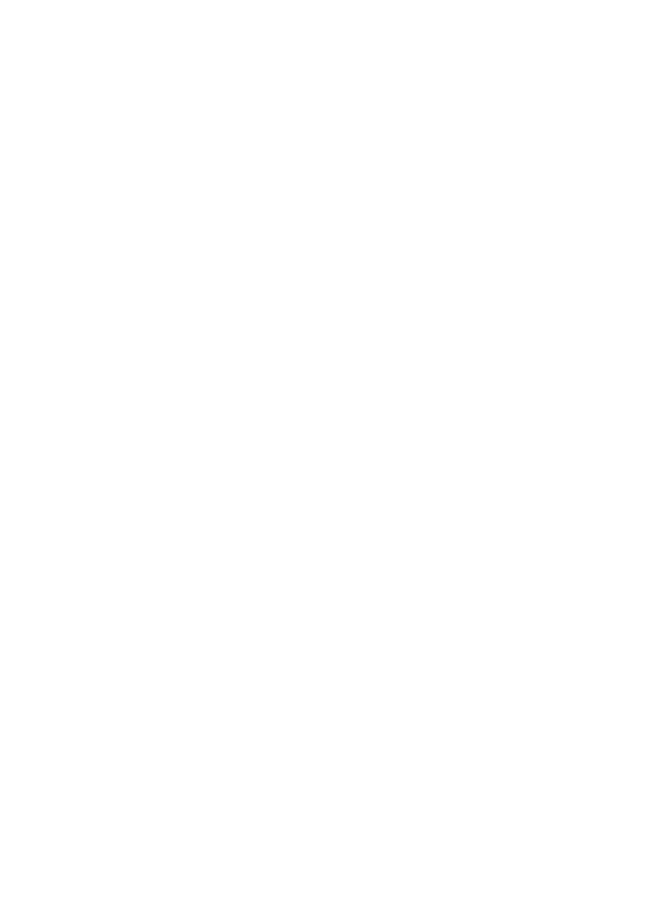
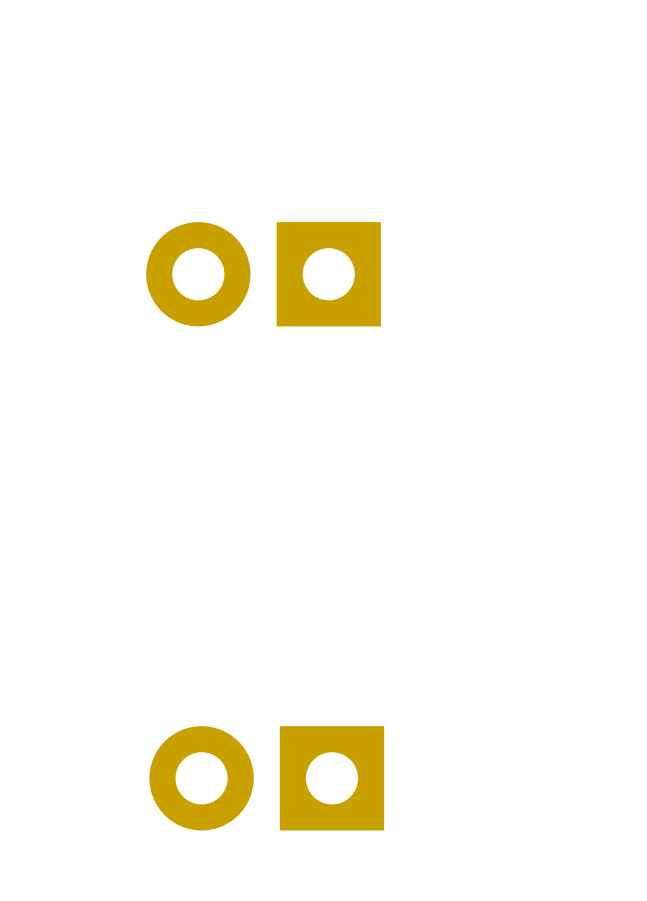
part: none -> (263, 274)
part: none -> (266, 778)

